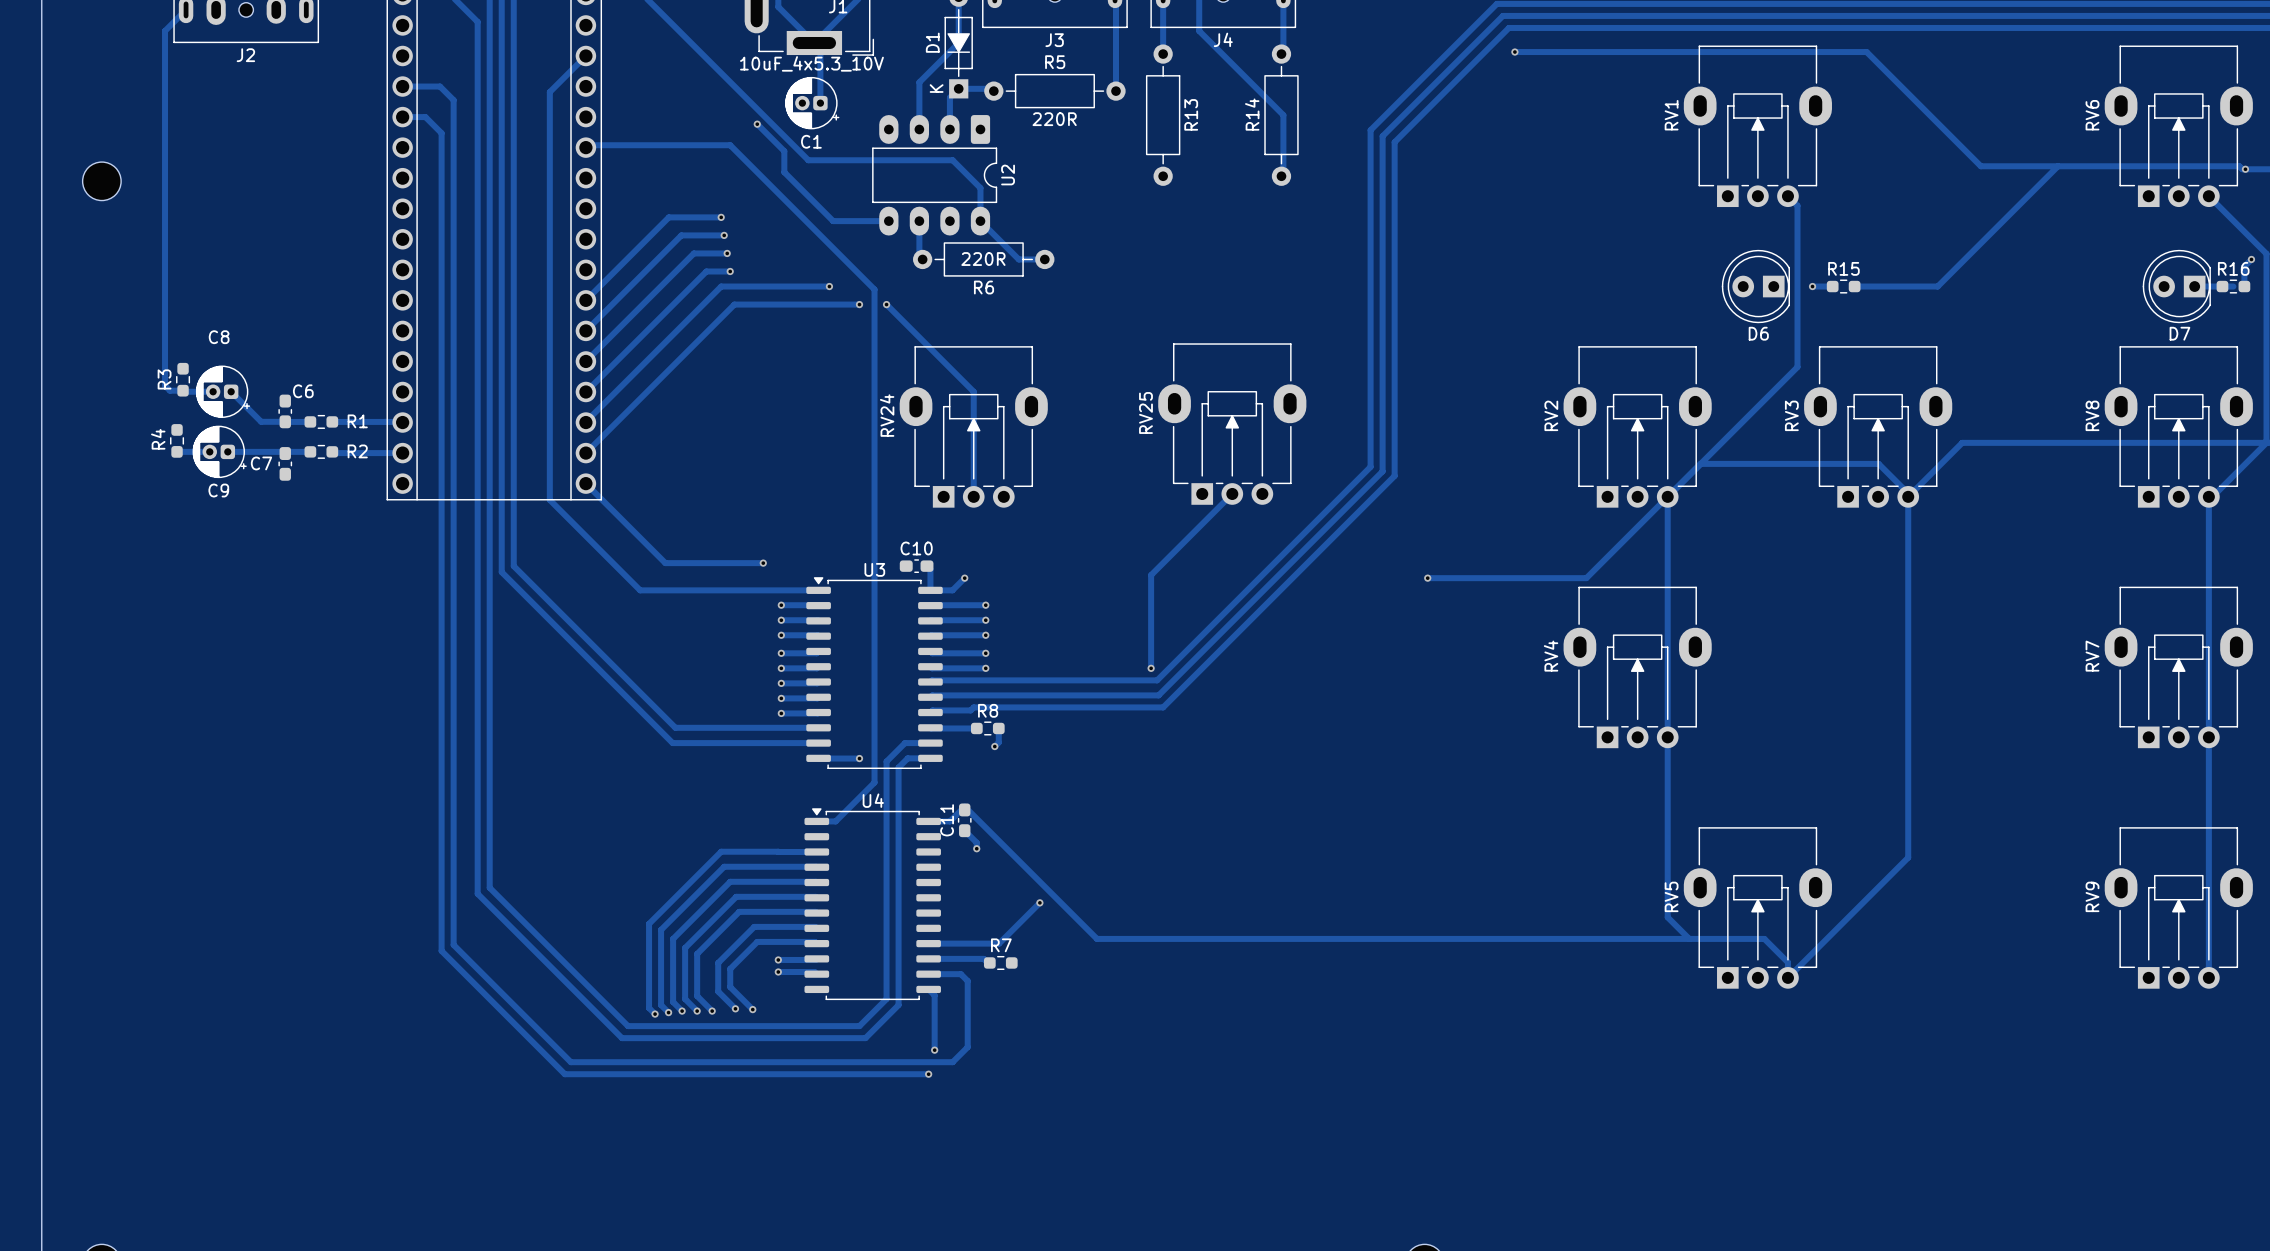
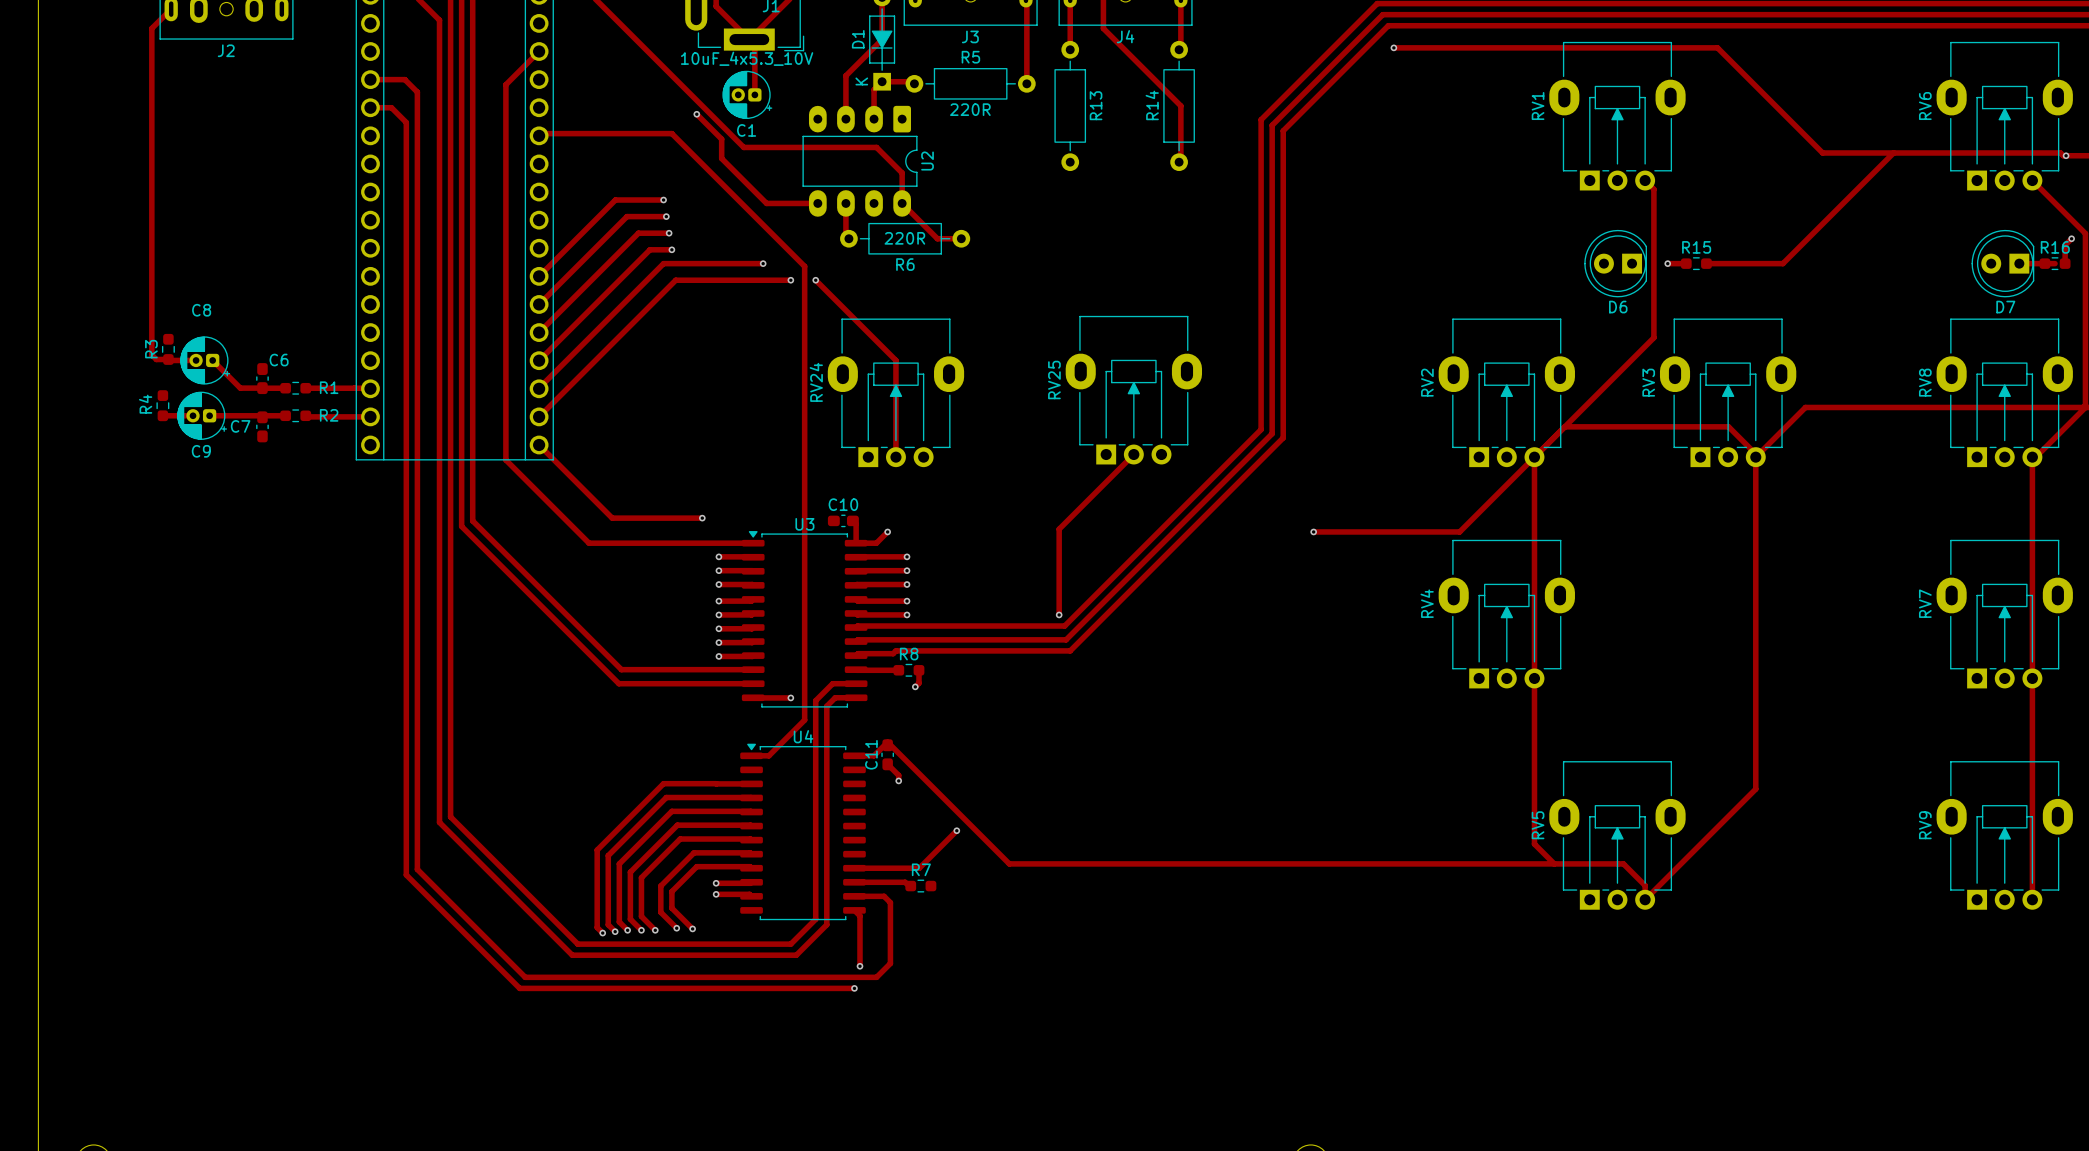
part: (101, 181) -> none

